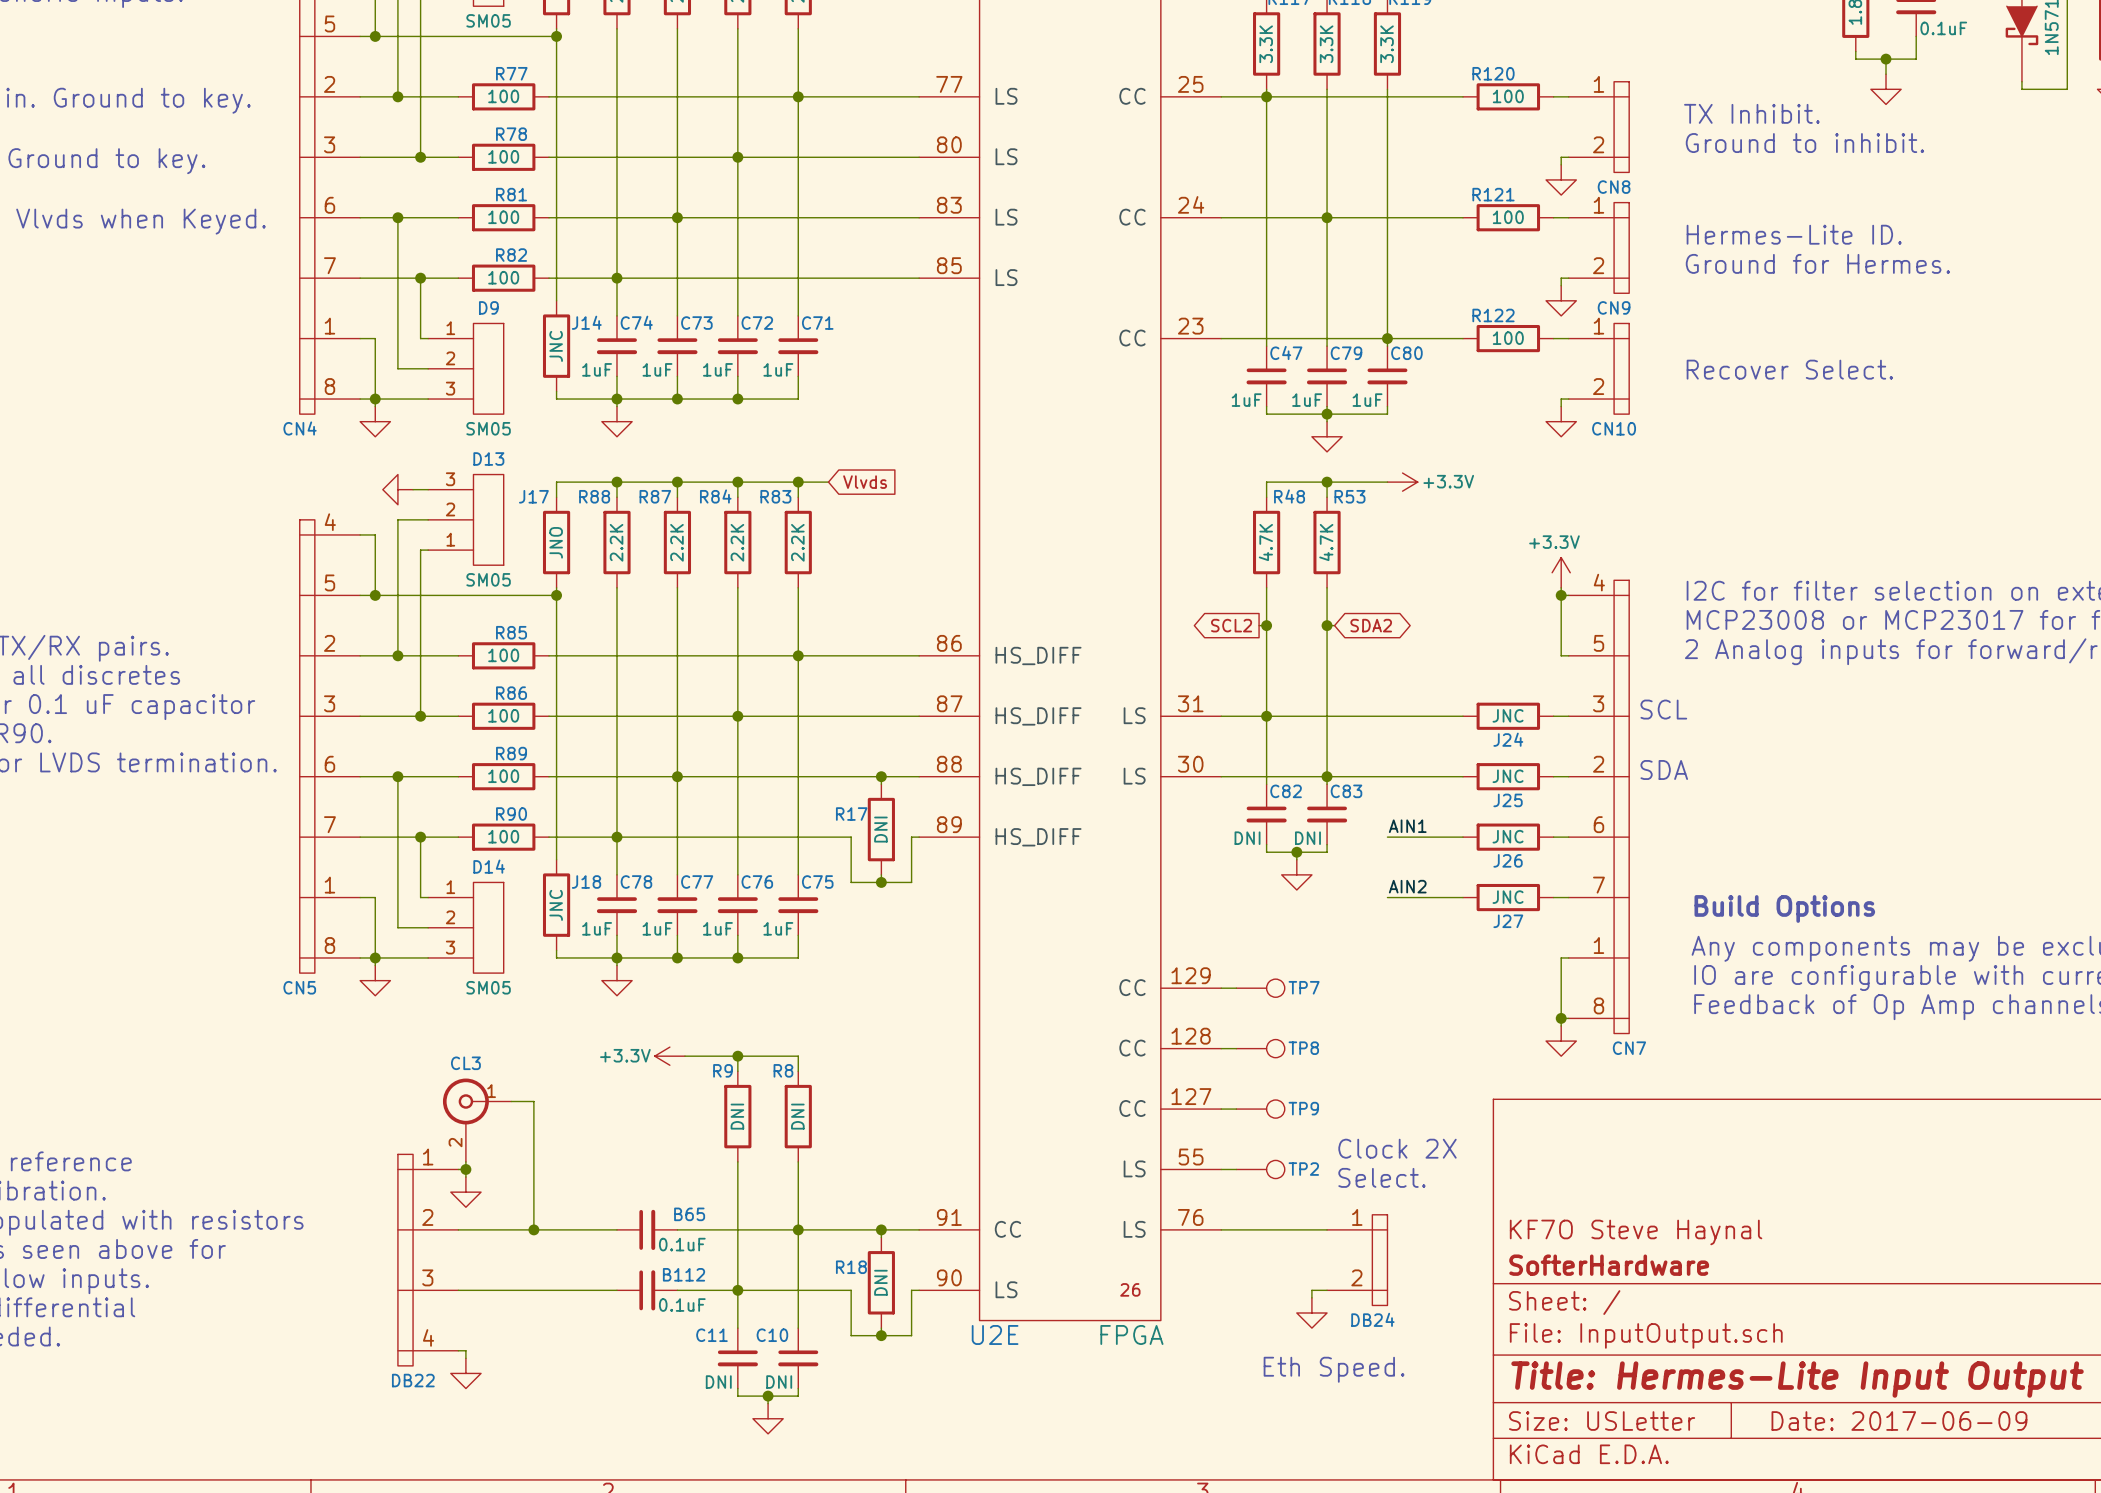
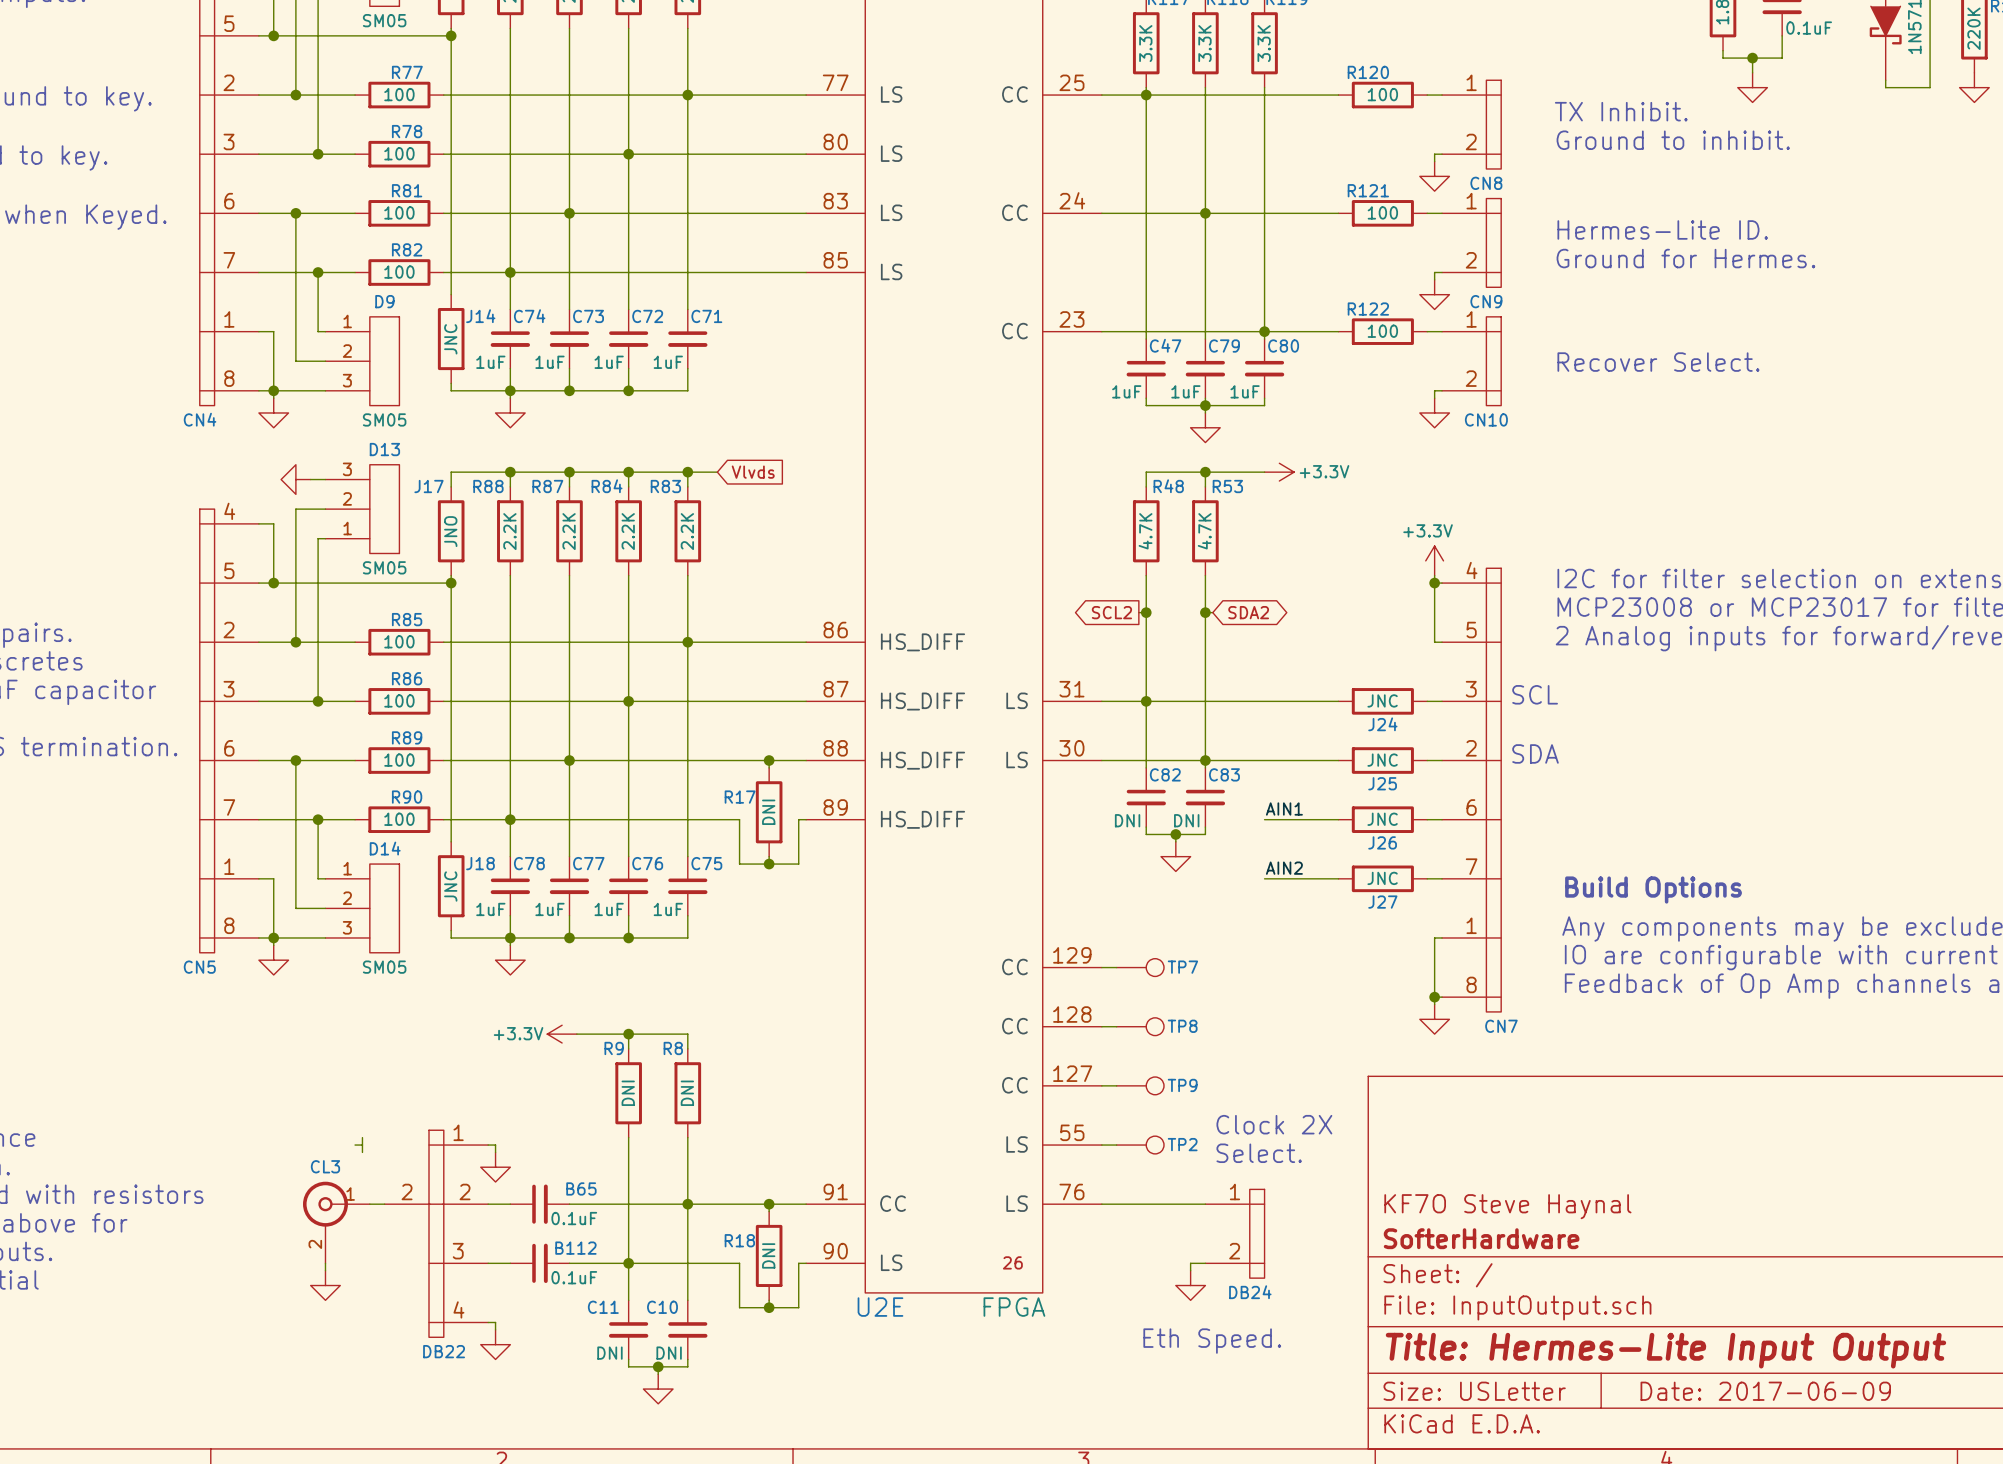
wire: (511, 1101) (533, 1101) (533, 1229) -> none
CL3 position: (477, 1120) -> (336, 1222)
DB22 symbol: [397, 1154, 459, 1366] -> [384, 1130, 489, 1338]
junction: (465, 1169) -> none
wire: none -> (488, 1145) (495, 1145) (495, 1152)
power symbol: (465, 1192) -> none
power symbol: none -> (495, 1167)
junction: (533, 1229) -> none
wire: none -> (325, 1263) (325, 1270)
wire: (458, 1290) (594, 1290) -> none
power symbol: none -> (325, 1285)
wire: (458, 1350) (465, 1350) (465, 1358) -> (488, 1322) (495, 1322) (495, 1329)
power symbol: (465, 1373) -> none
power symbol: none -> (495, 1344)

